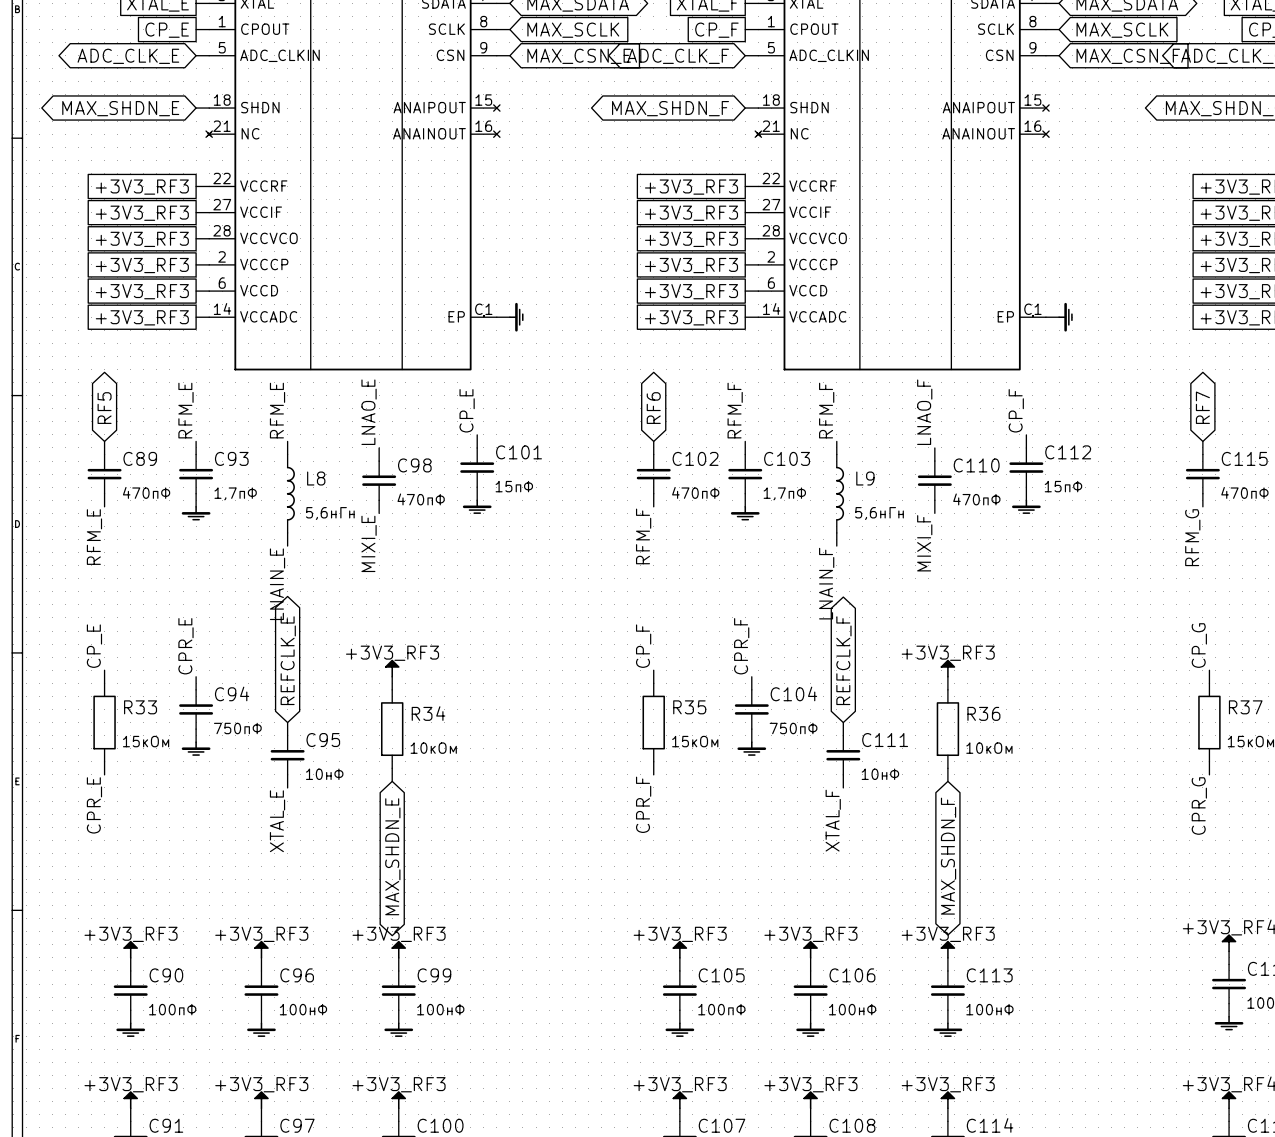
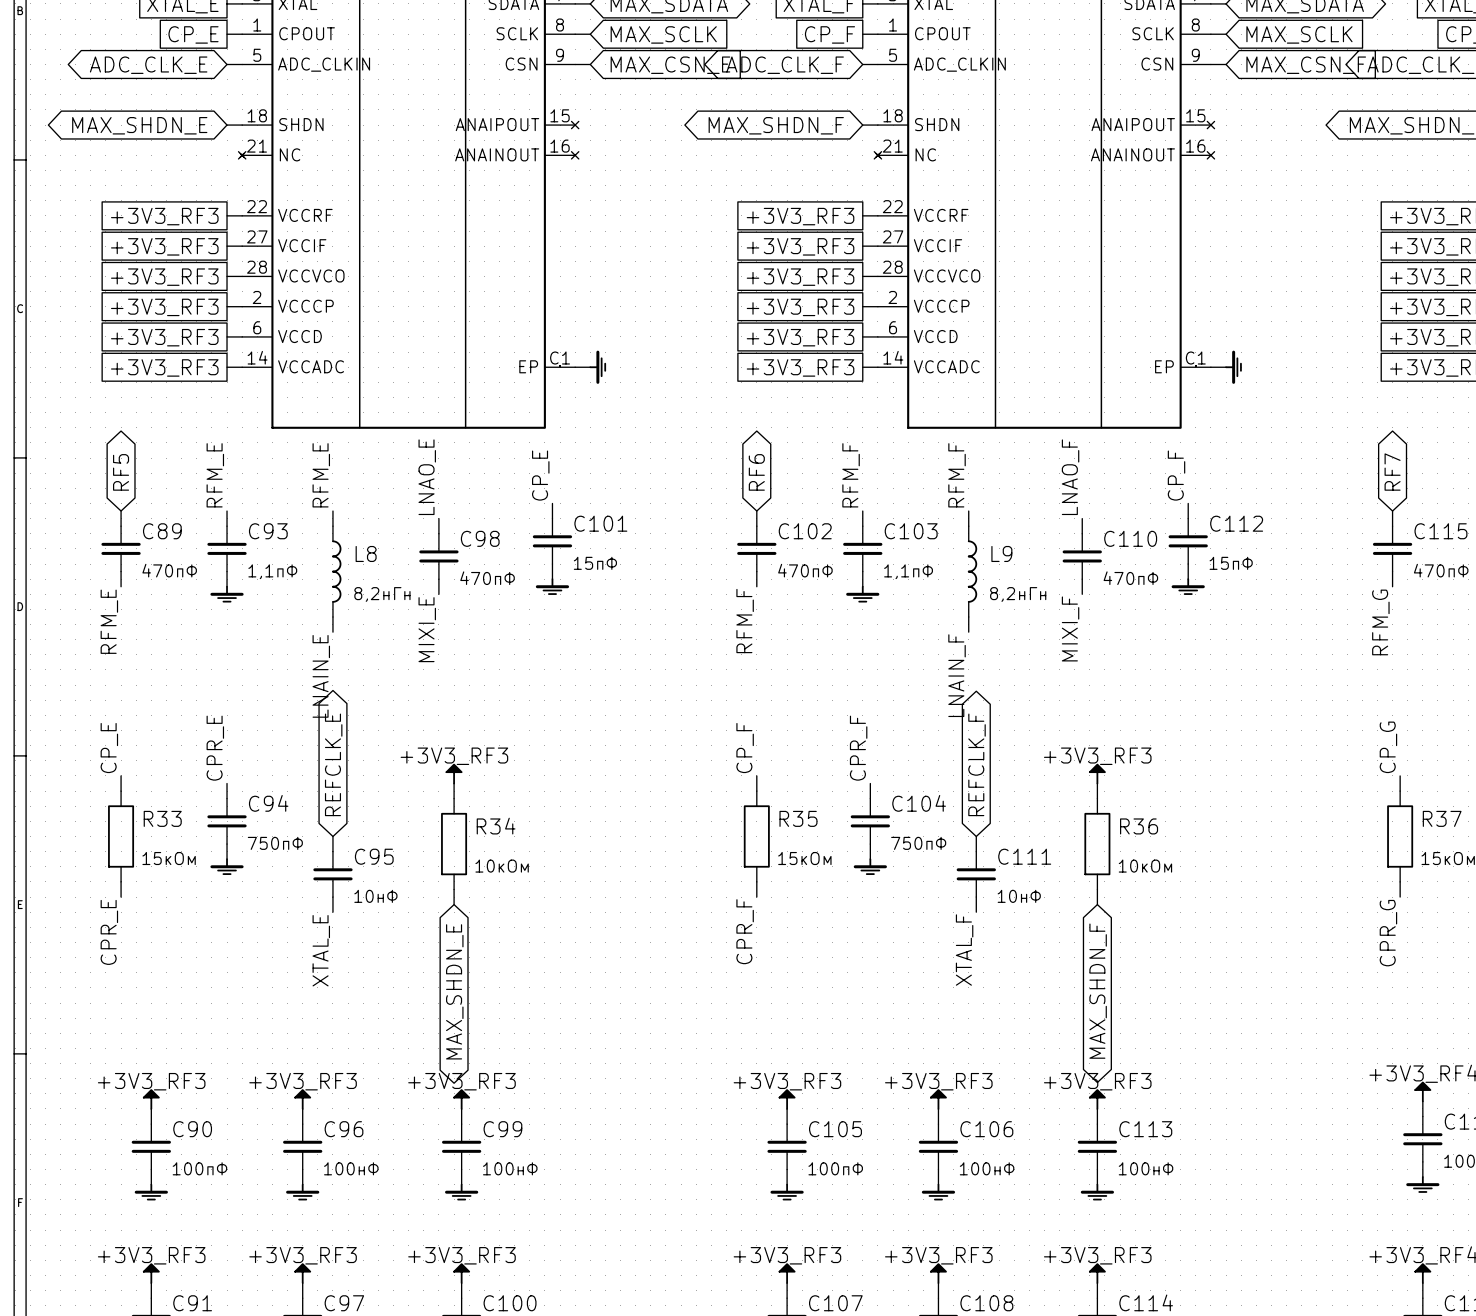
C93 value: 1,7пФ (235, 493) -> 1,1пФ (272, 571)
C103 value: 1,7пФ (784, 493) -> 1,1пФ (908, 571)
L8 value: 5,6нГн (330, 513) -> 8,2нГн (382, 594)
L9 value: 5,6нГн (879, 513) -> 8,2нГн (1018, 594)

